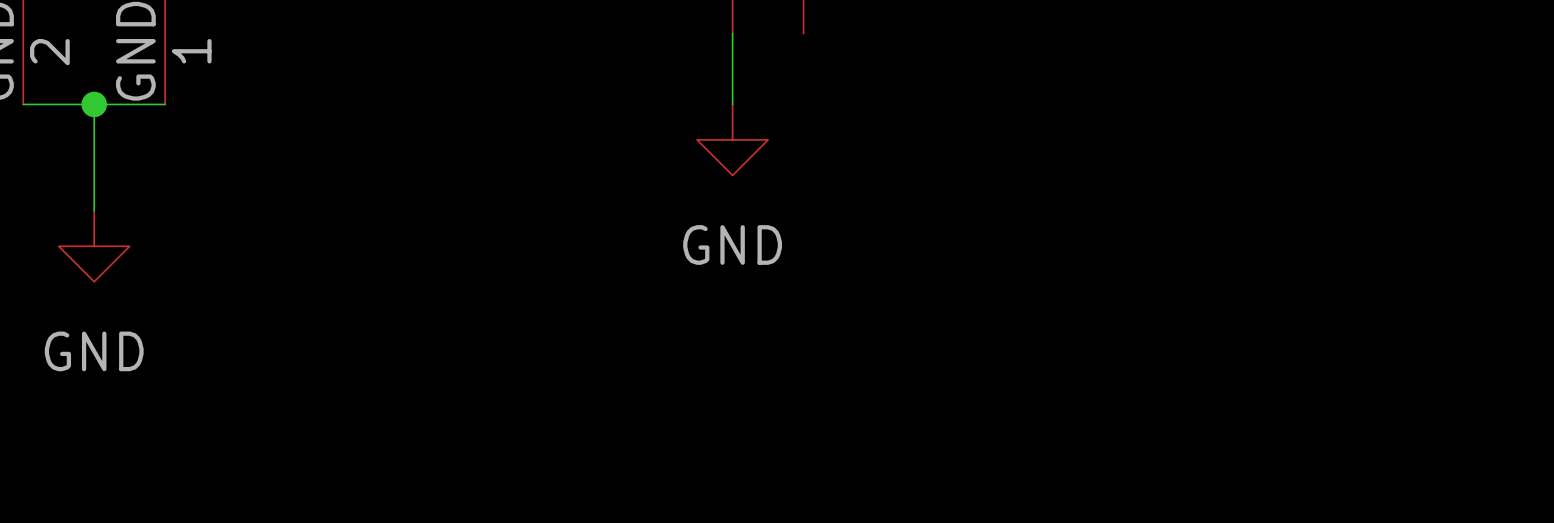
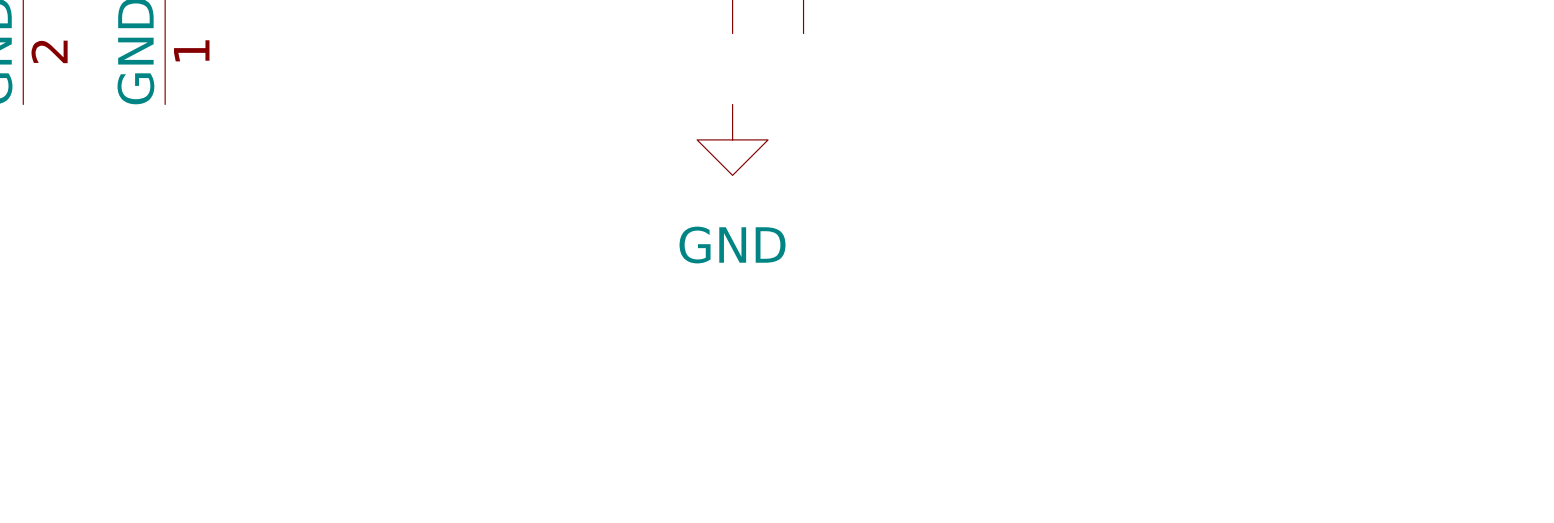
wire: (732, 33) (732, 104) -> none
wire: (23, 104) (165, 104) -> none
wire: (94, 104) (94, 210) -> none
junction: (94, 104) -> none
power symbol: GND (94, 246) -> none

